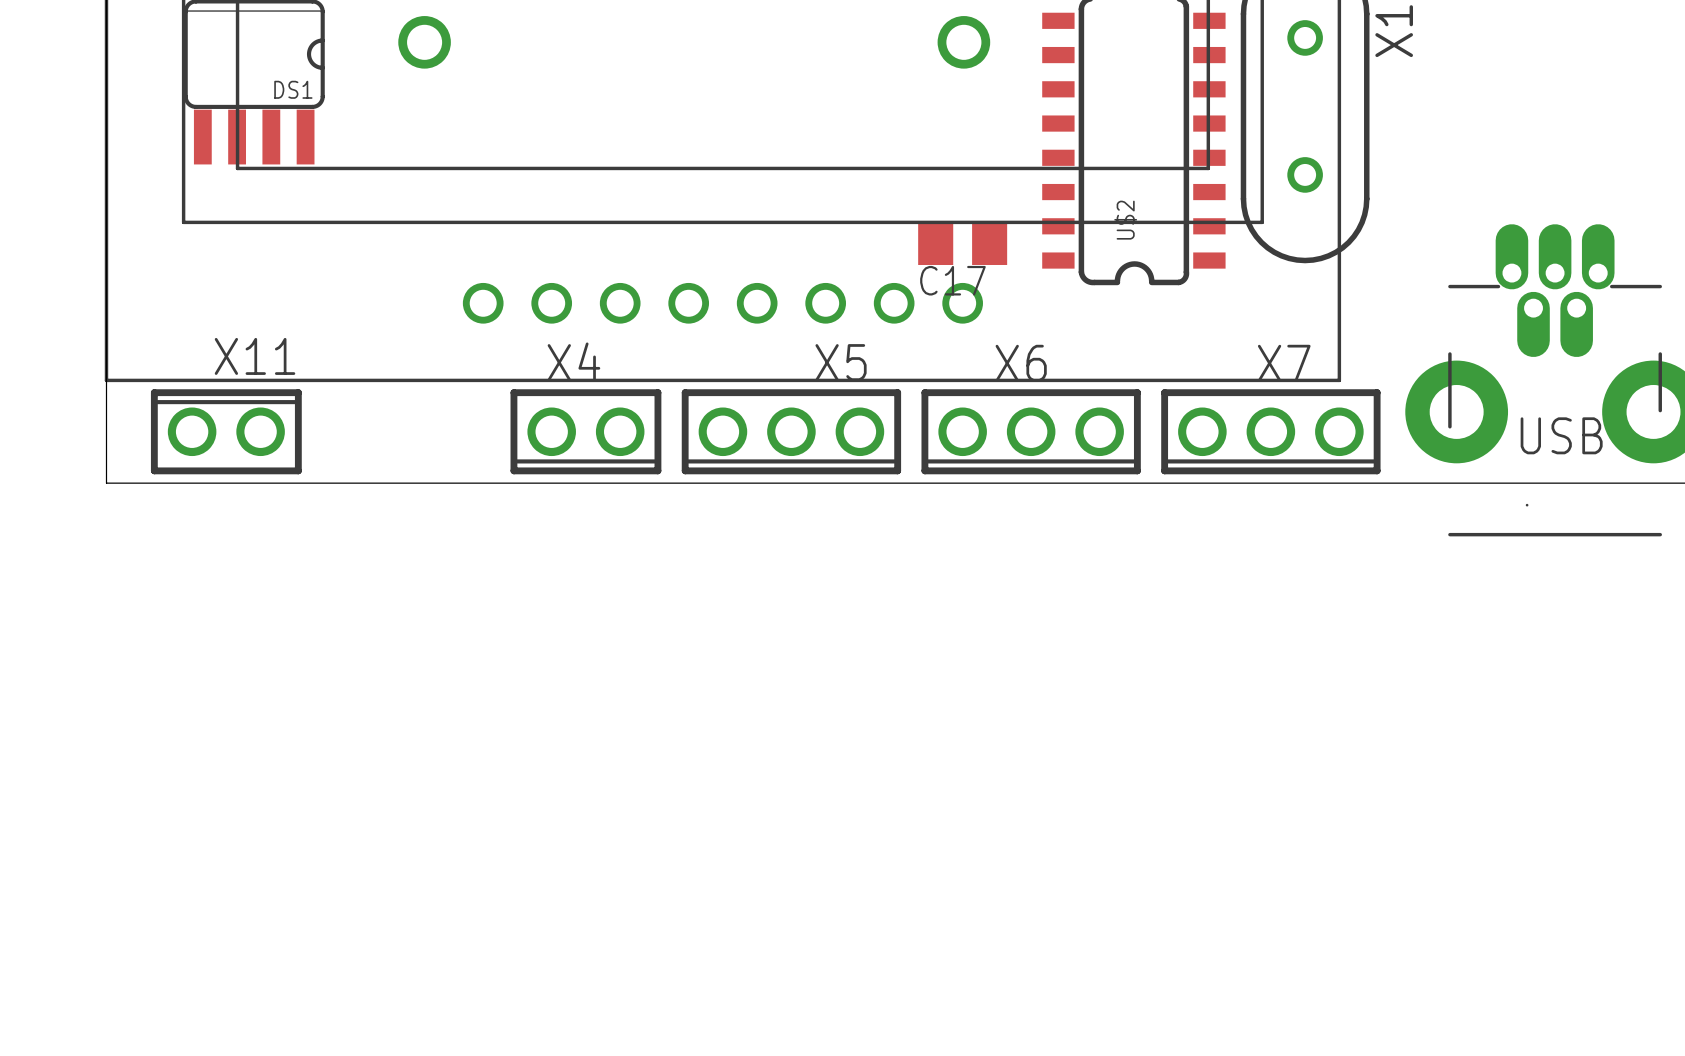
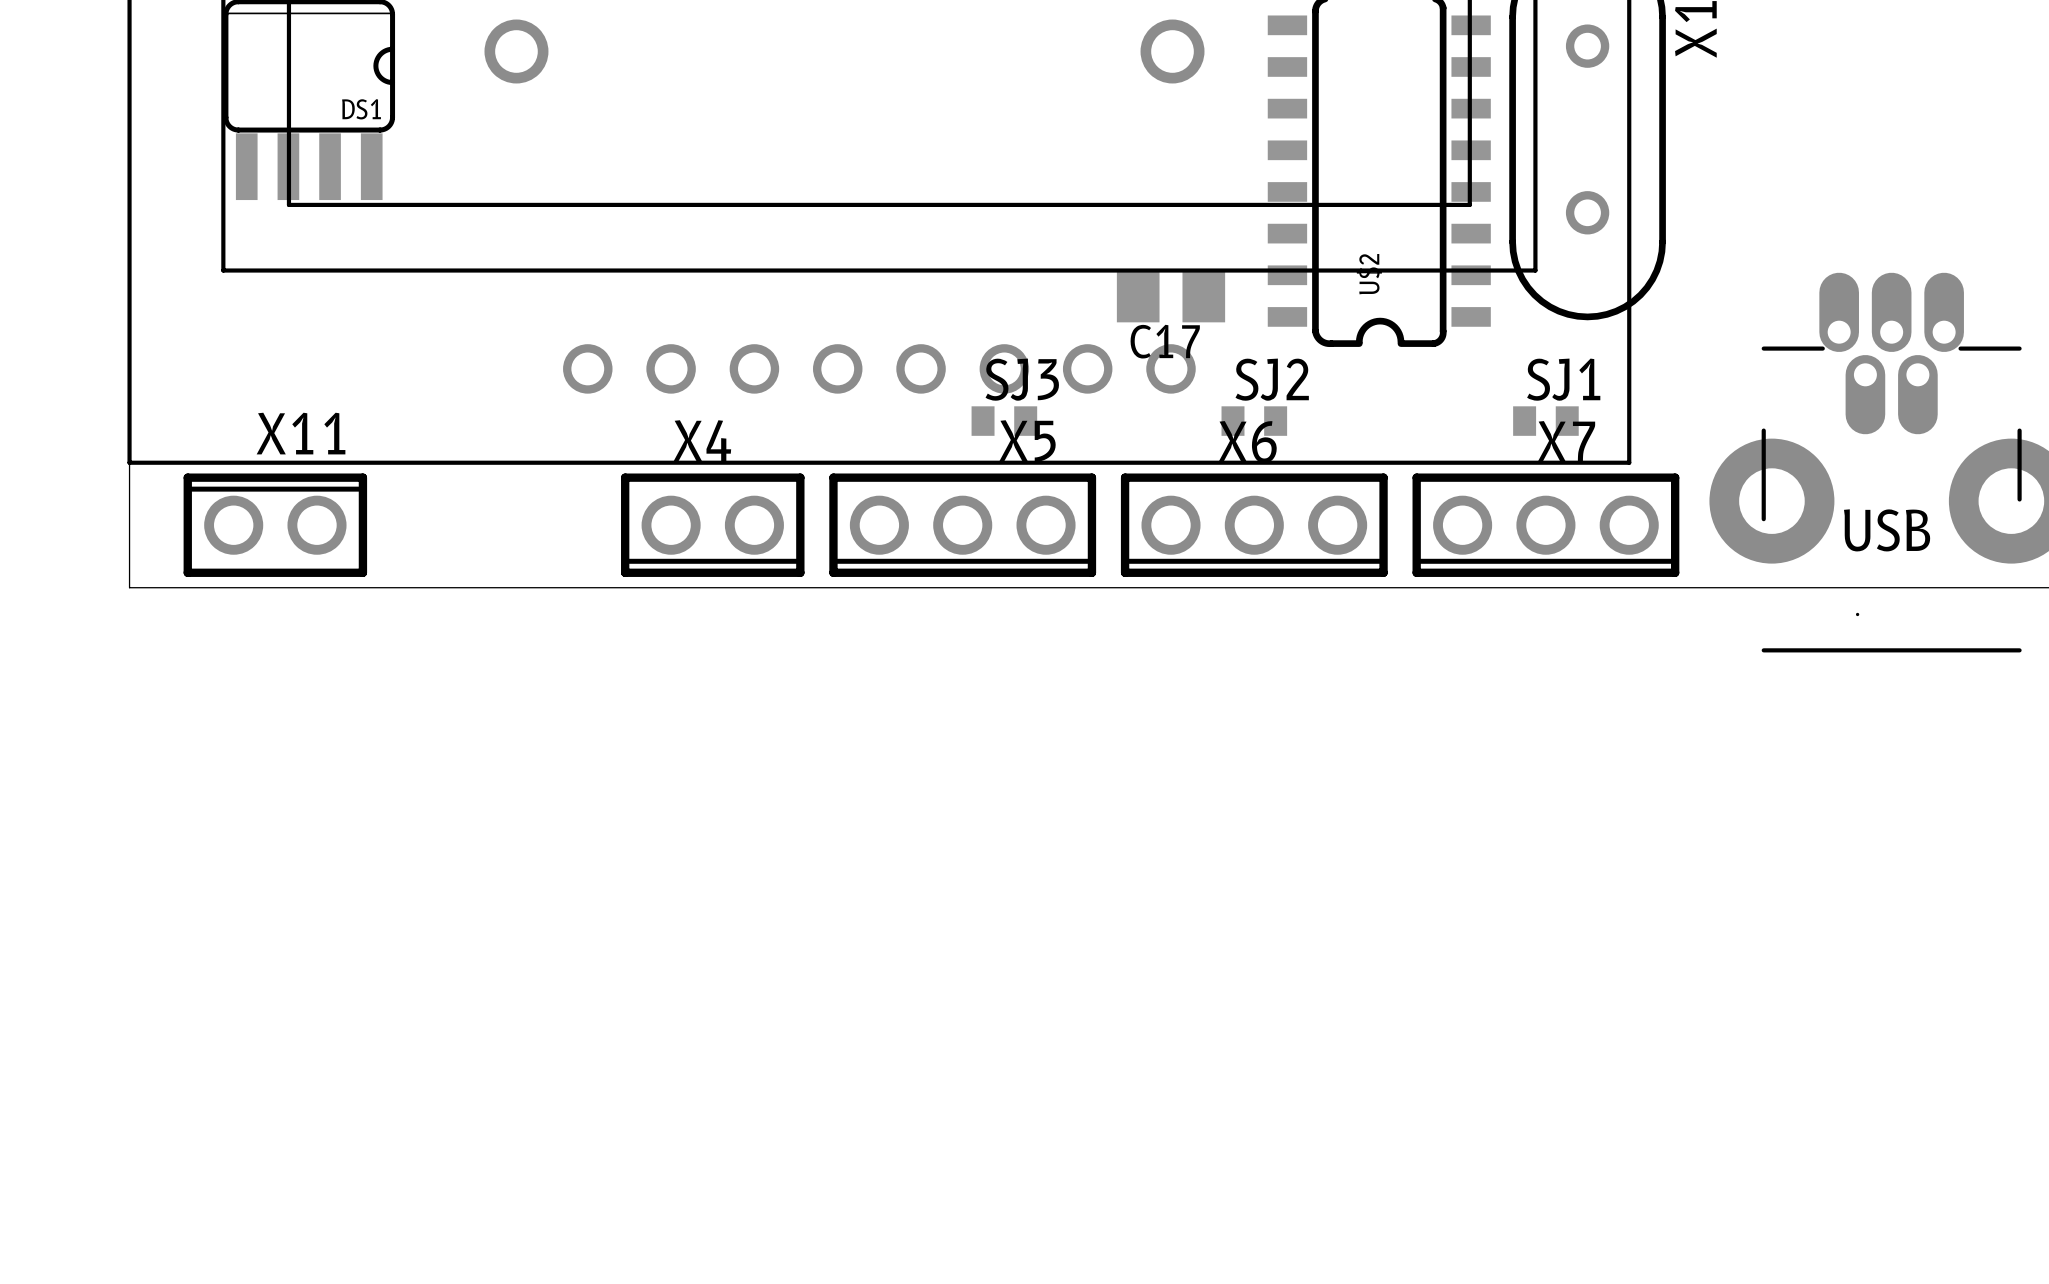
SJ3: none -> (1004, 421)
SJ2: none -> (1254, 421)
SJ1: none -> (1545, 421)

